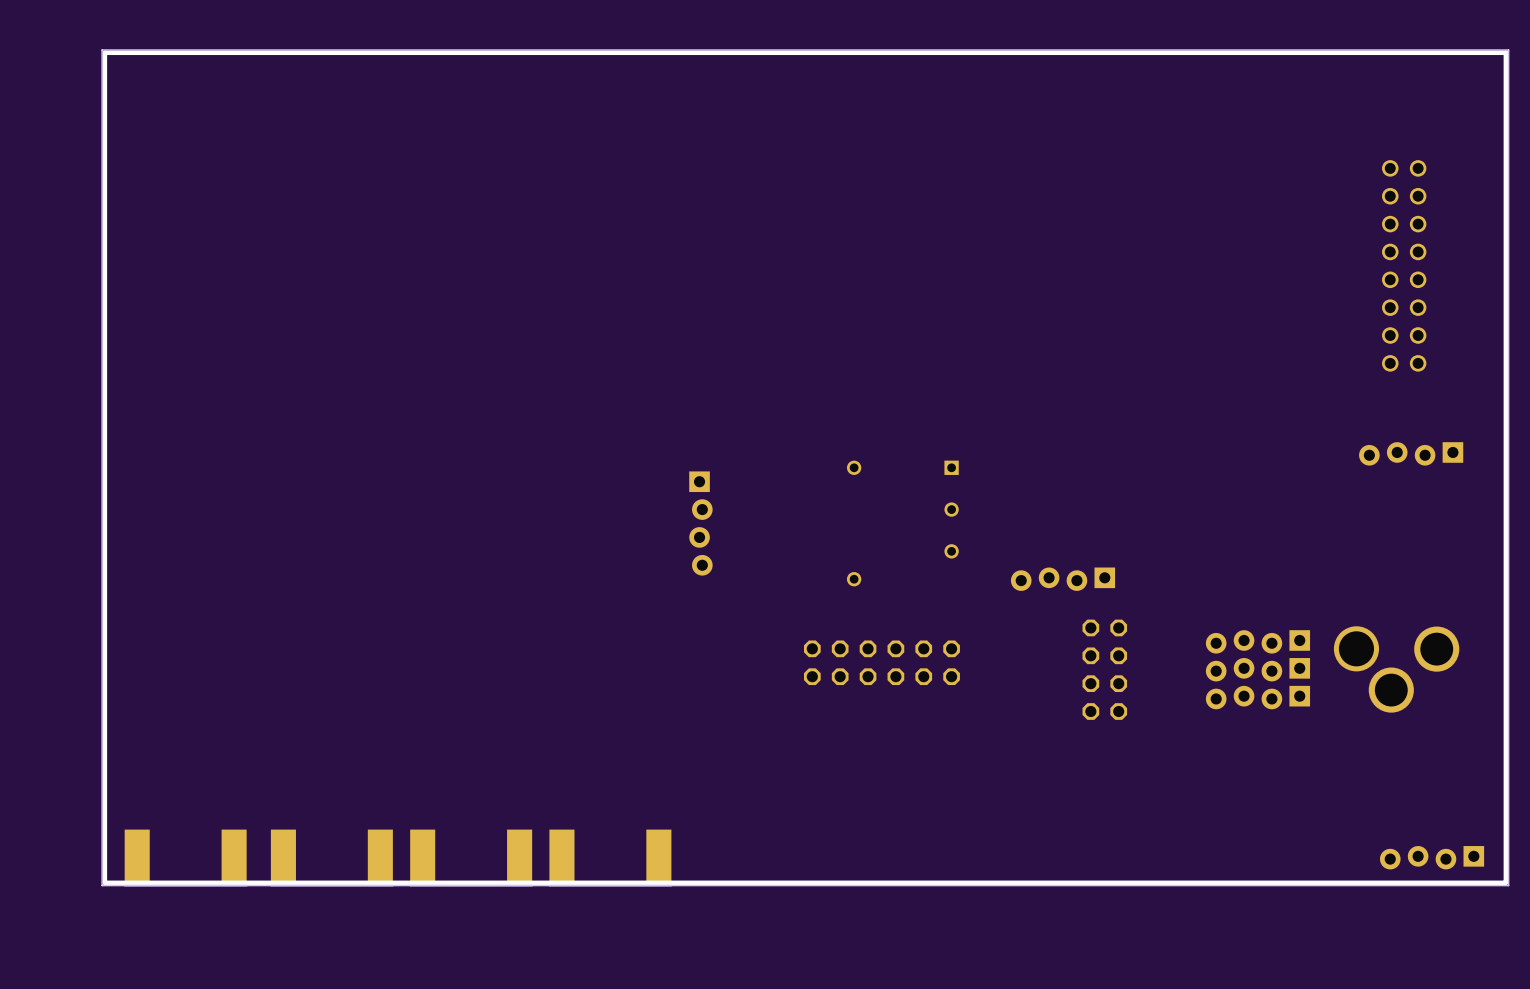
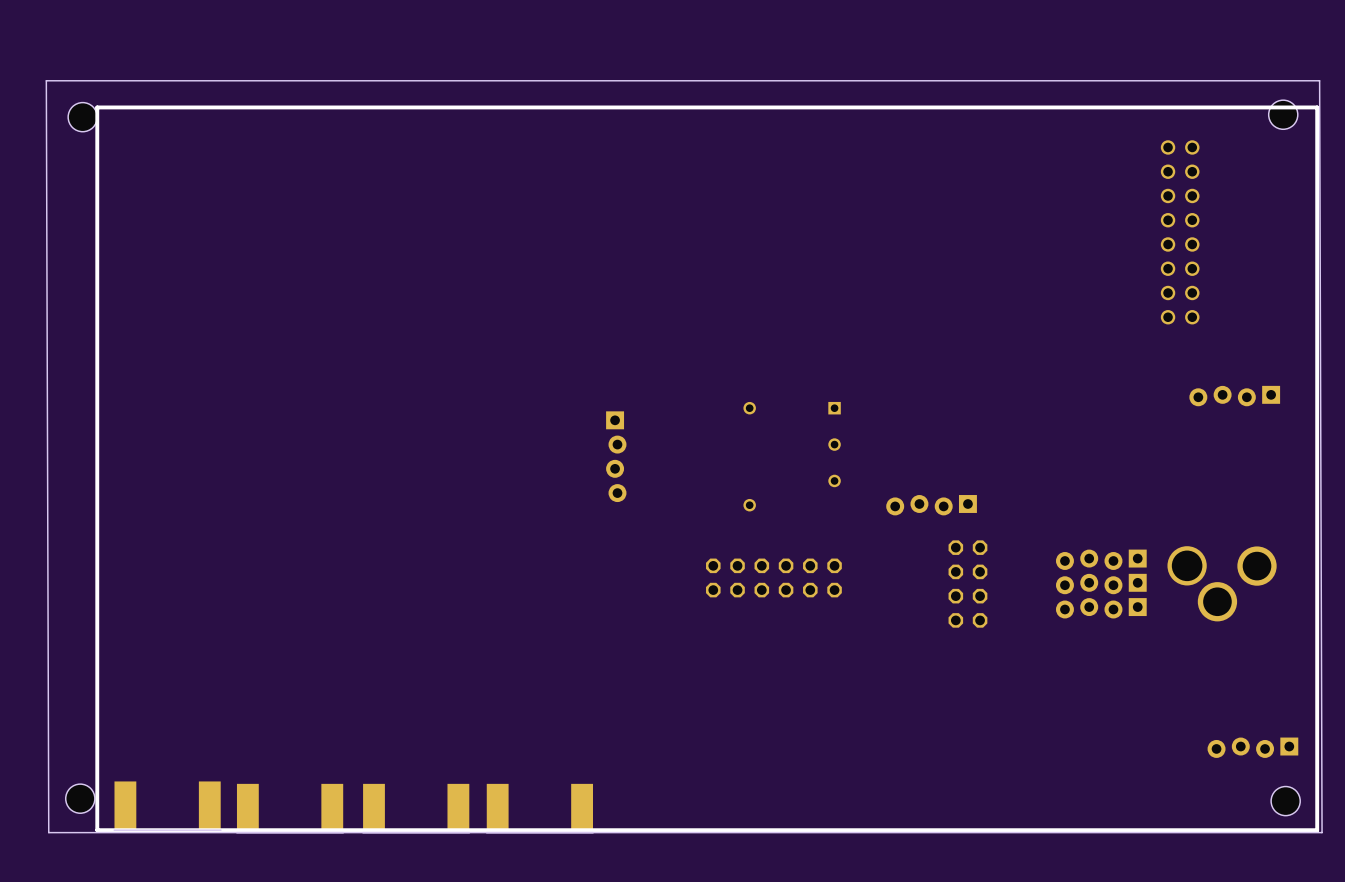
board edge: (1508, 50) (102, 50) (102, 885) (1508, 885) (1508, 50) -> (1319, 80) (1322, 832) (48, 832) (46, 80) (1319, 80)
line: (1505, 122) (1505, 52) (104, 52) (104, 122) -> (1317, 107) (97, 107)
part: none -> (1283, 114)
part: none -> (82, 117)
part position: (1404, 265) -> (1180, 232)
part position: (185, 857) -> (167, 805)
part position: (331, 857) -> (290, 808)
part position: (471, 857) -> (416, 808)
part position: (610, 857) -> (539, 808)
line: (1505, 882) (104, 882) -> (1317, 769) (1317, 830) (97, 830) (97, 769)
part: none -> (80, 798)
part: none -> (1285, 801)

